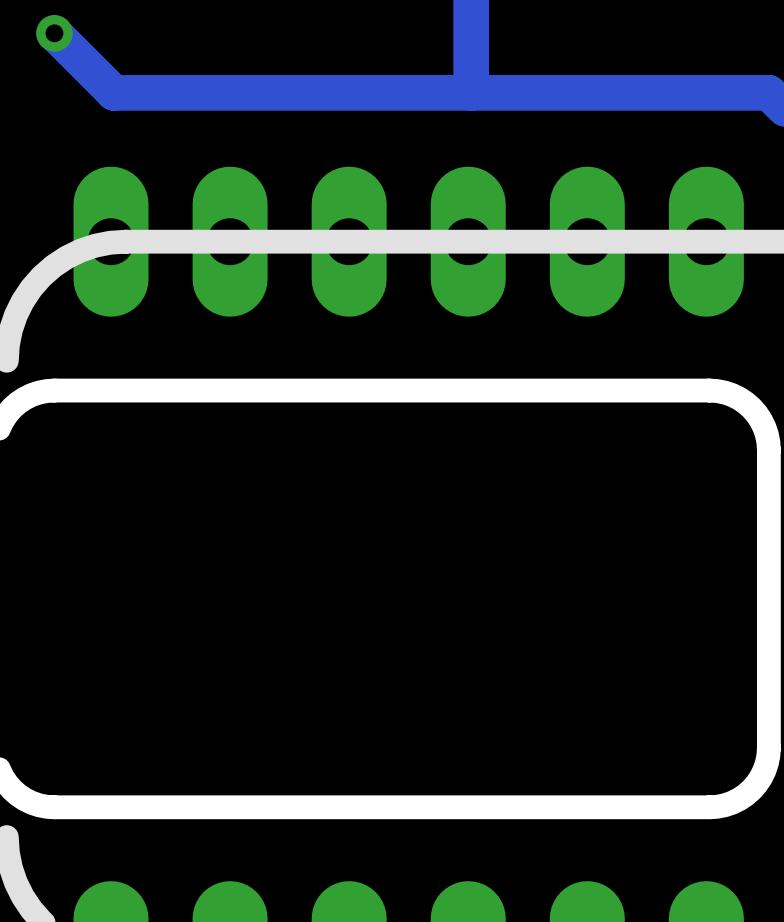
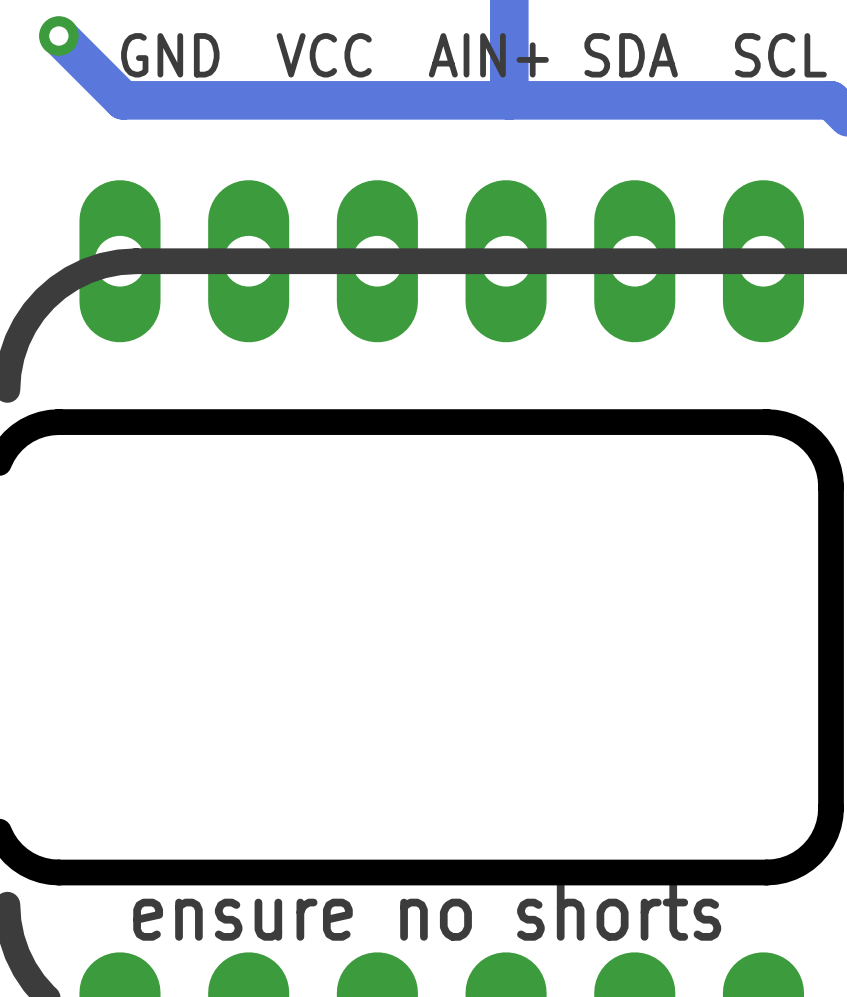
text: none -> GND VCC AIN+ SDA SCL (473, 55)
text: none -> ensure no shorts (427, 911)

